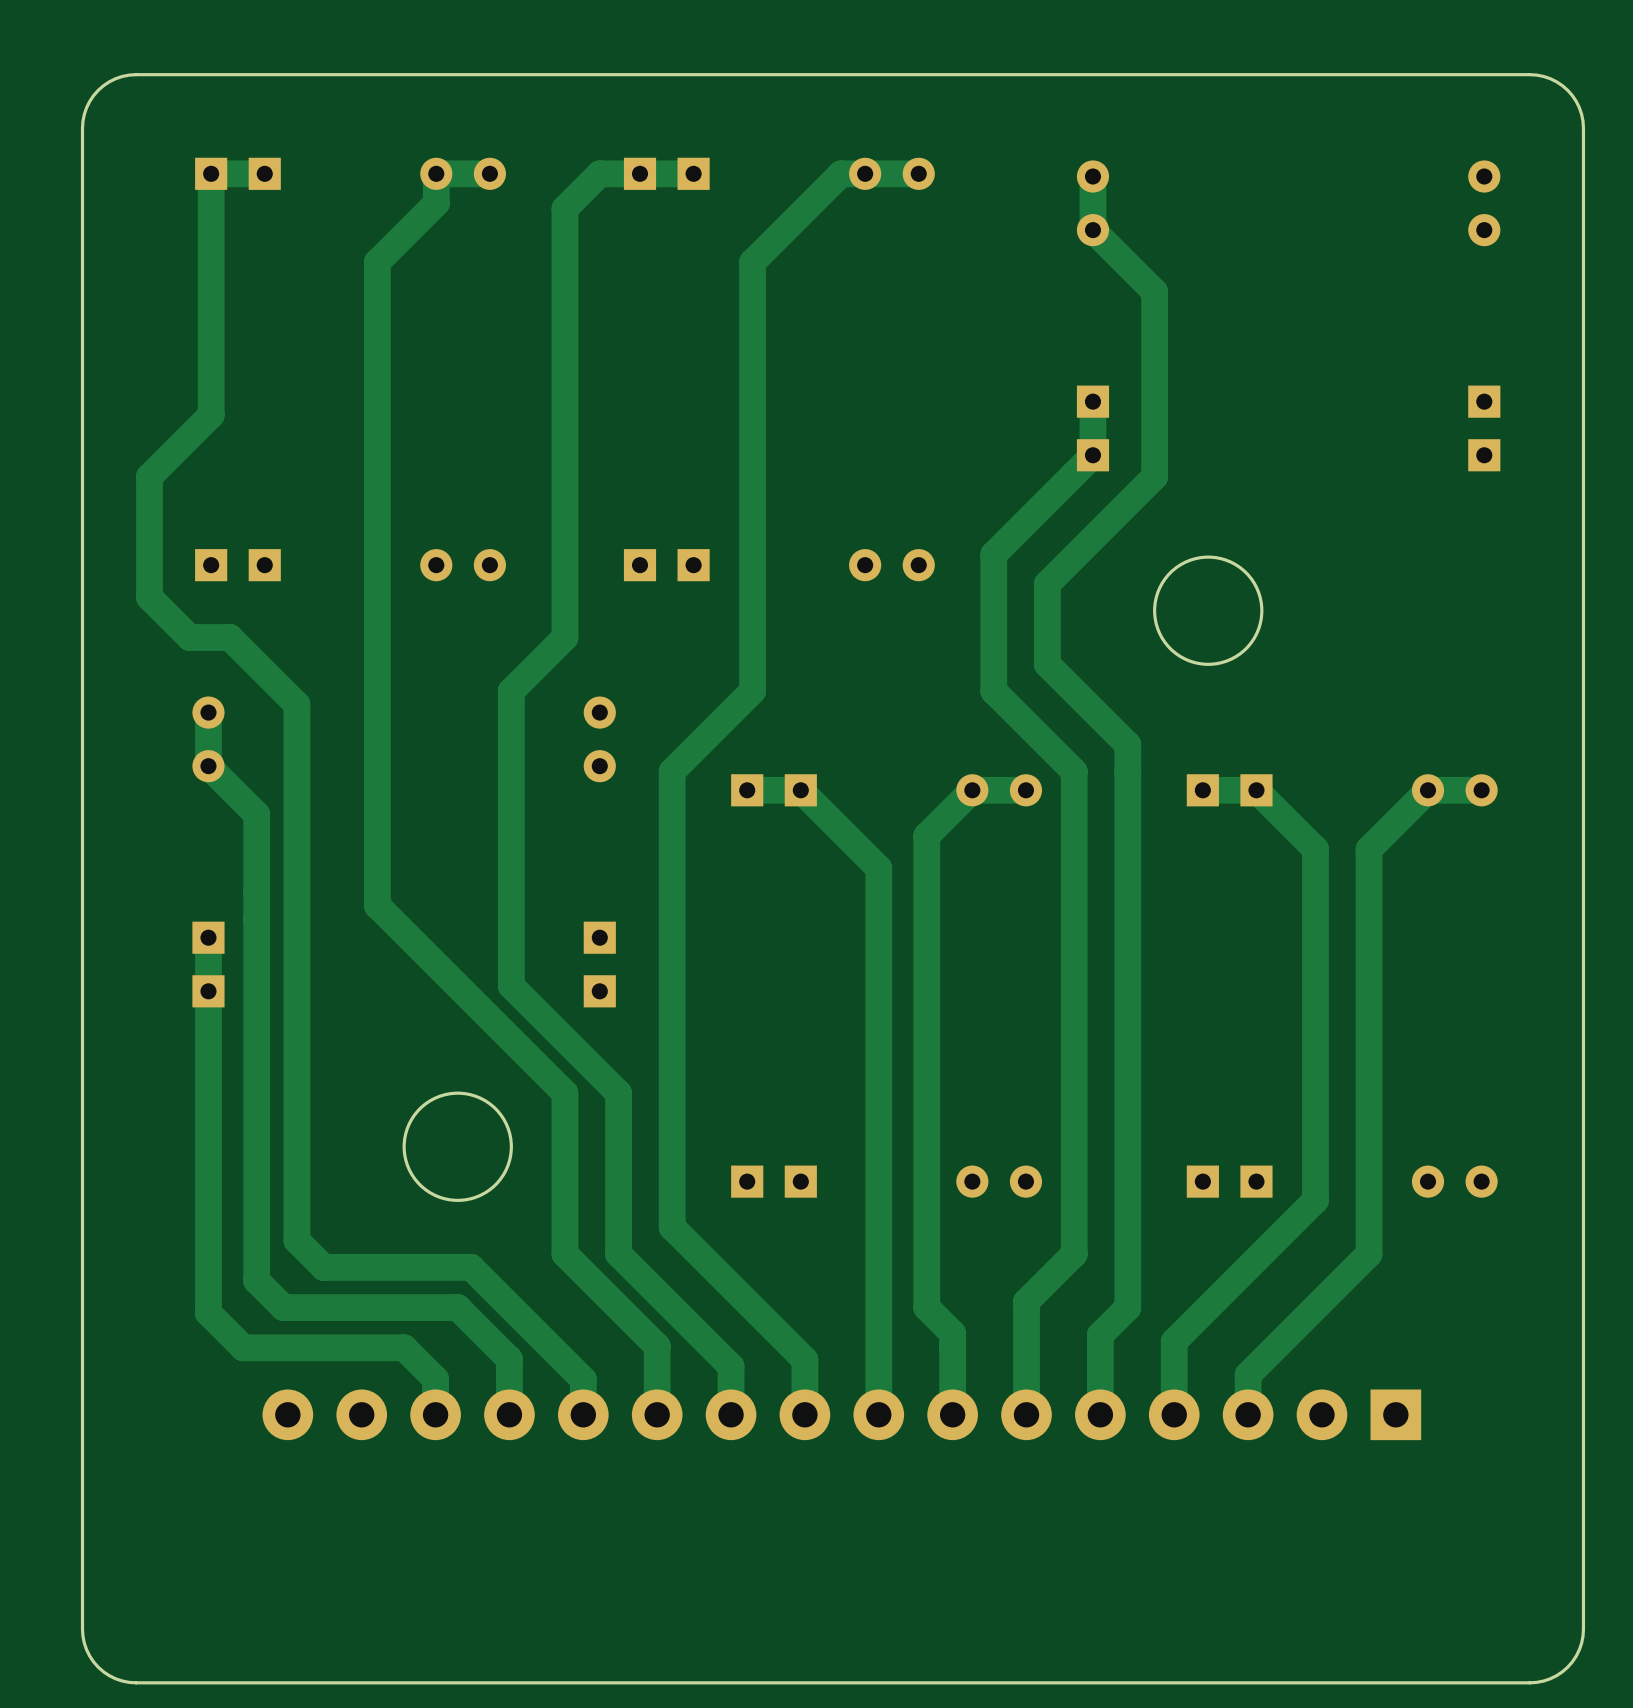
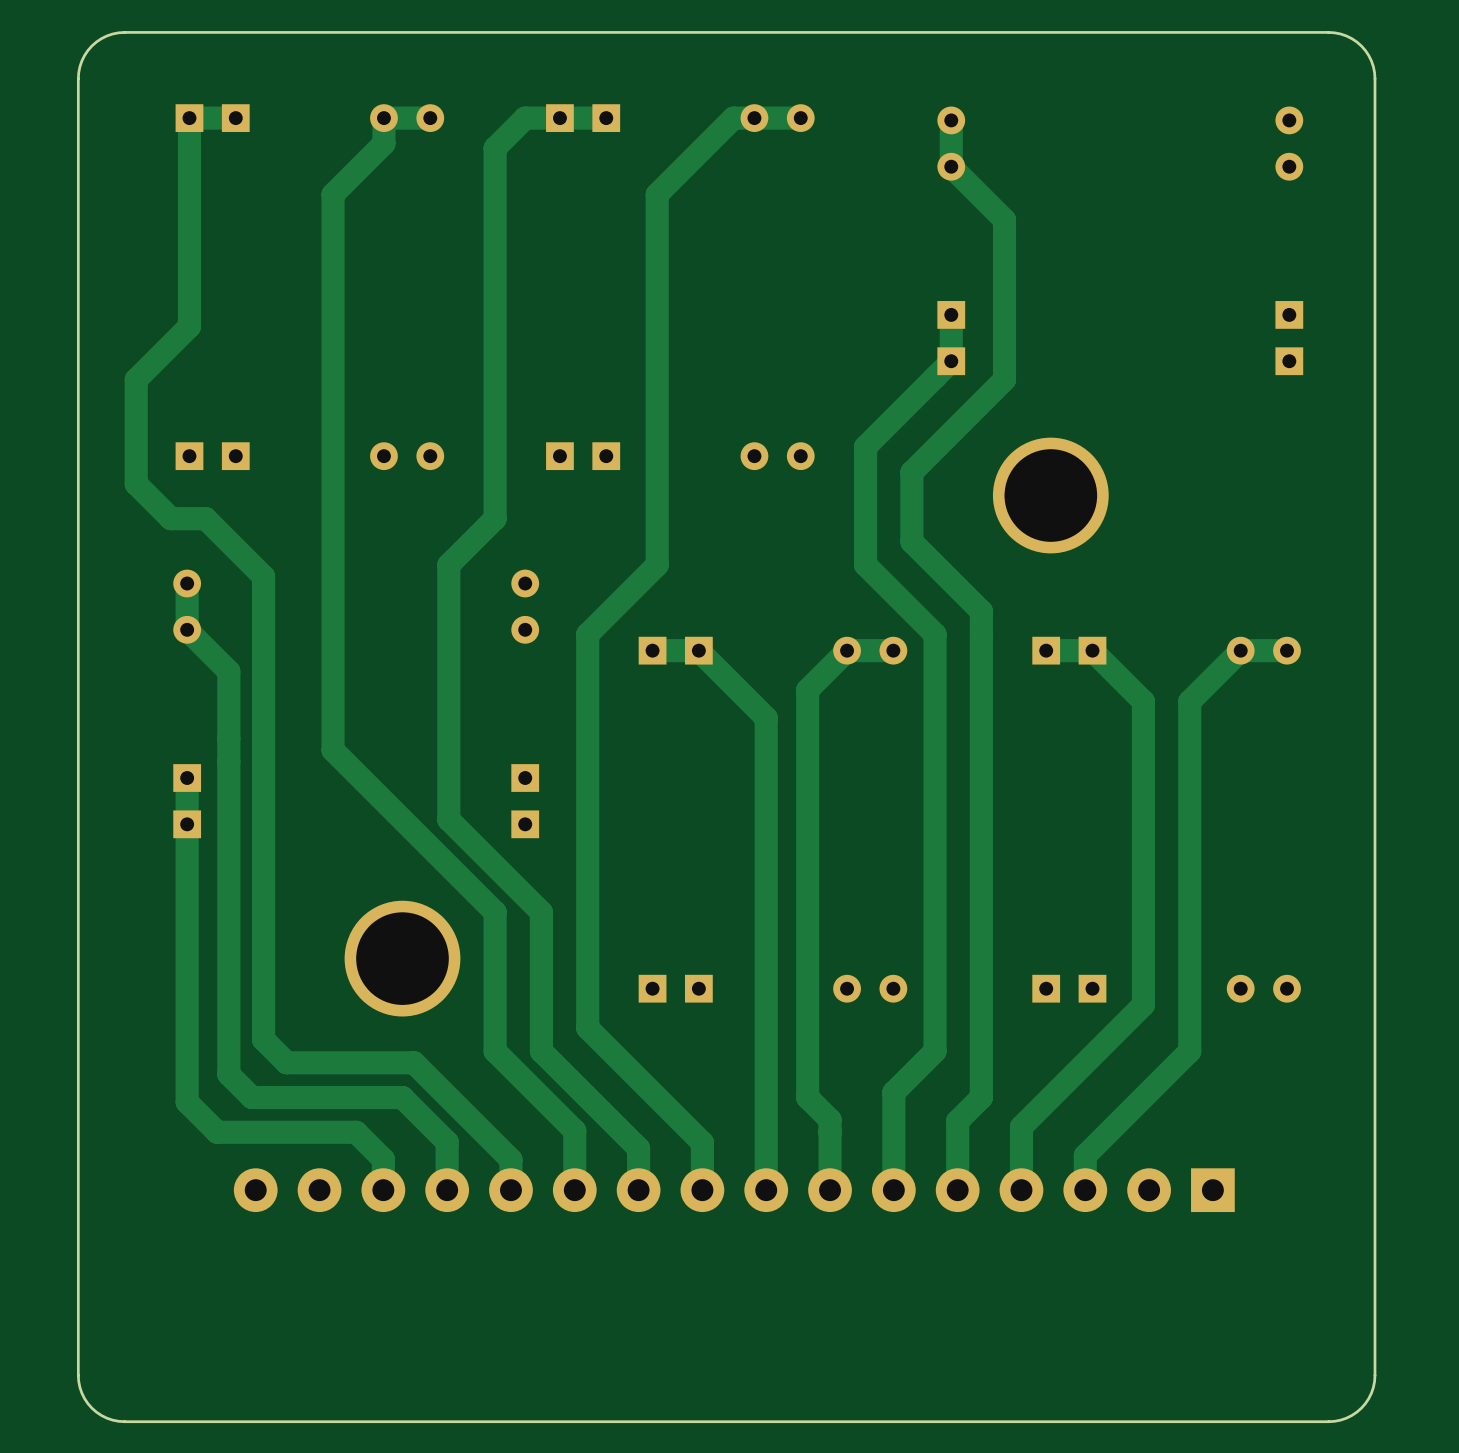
round board edge: [1153, 555, 1264, 666] -> none
part: none -> (1050, 495)
round board edge: [402, 1091, 513, 1202] -> none
part: none -> (402, 958)

